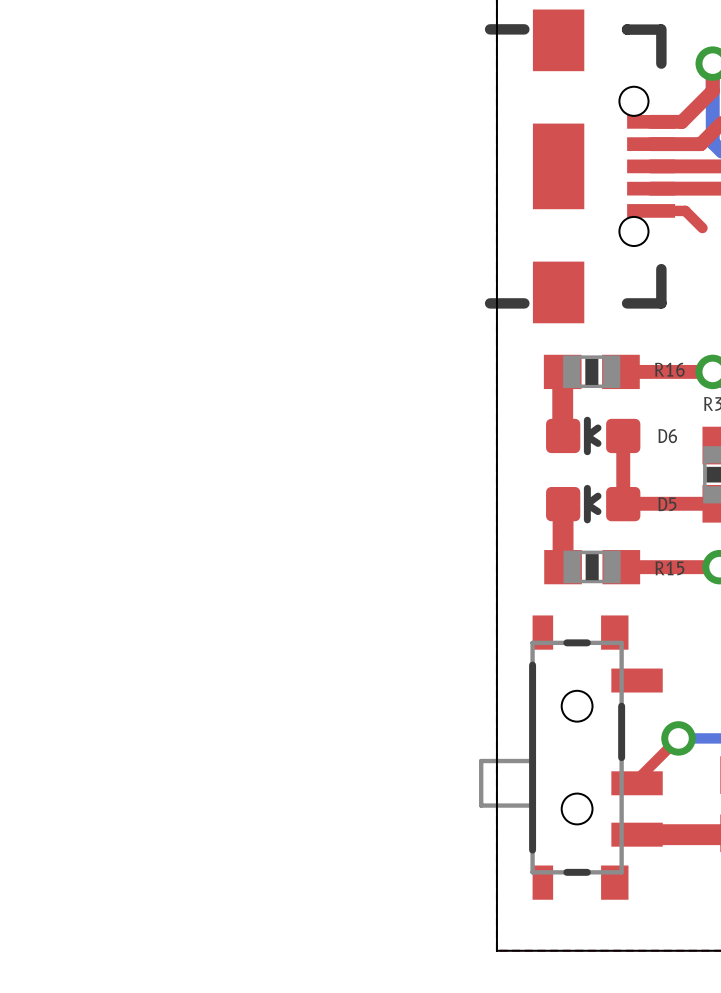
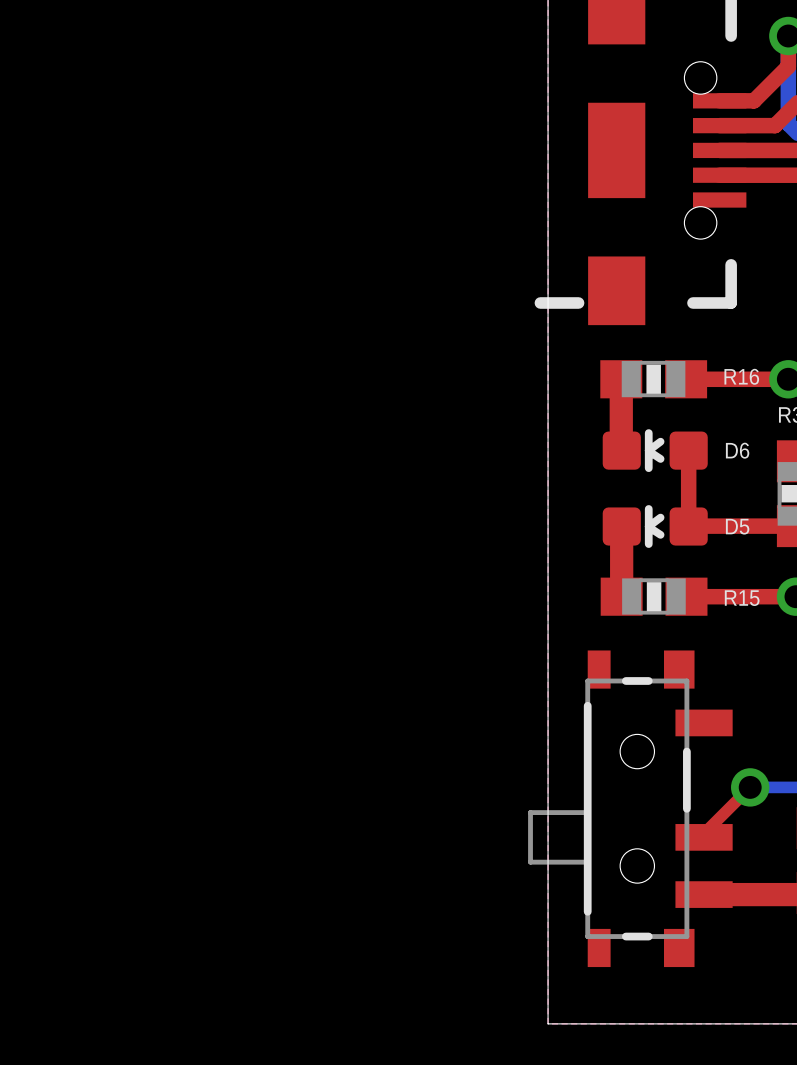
top track: (651, 210) (685, 210) (702, 228) -> none

